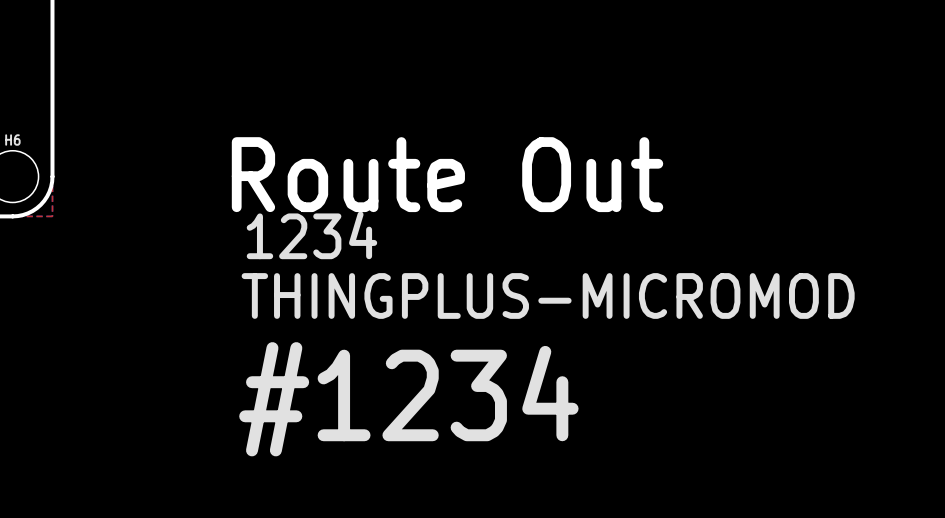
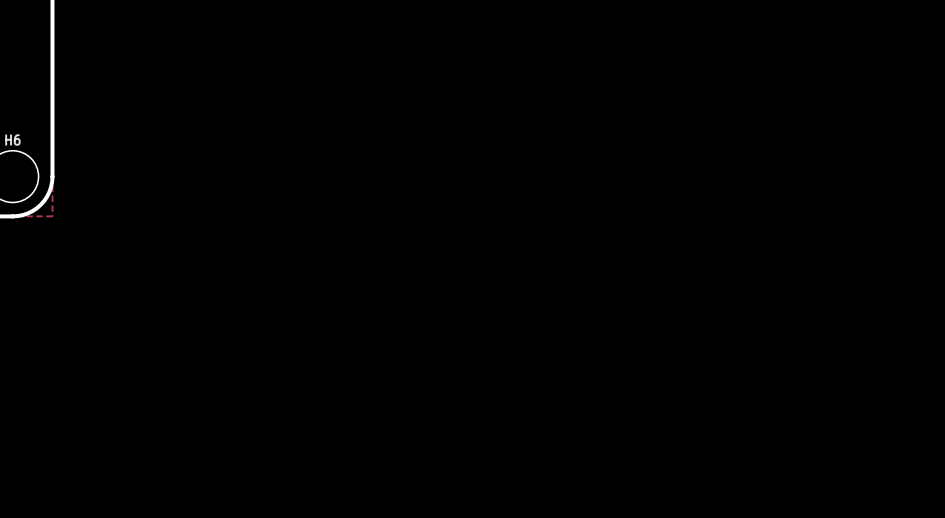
text: Route Out (447, 174) -> none
text: 1234 (311, 235) -> none
text: THINGPLUS-MICROMOD (548, 295) -> none
text: #1234 (408, 399) -> none

